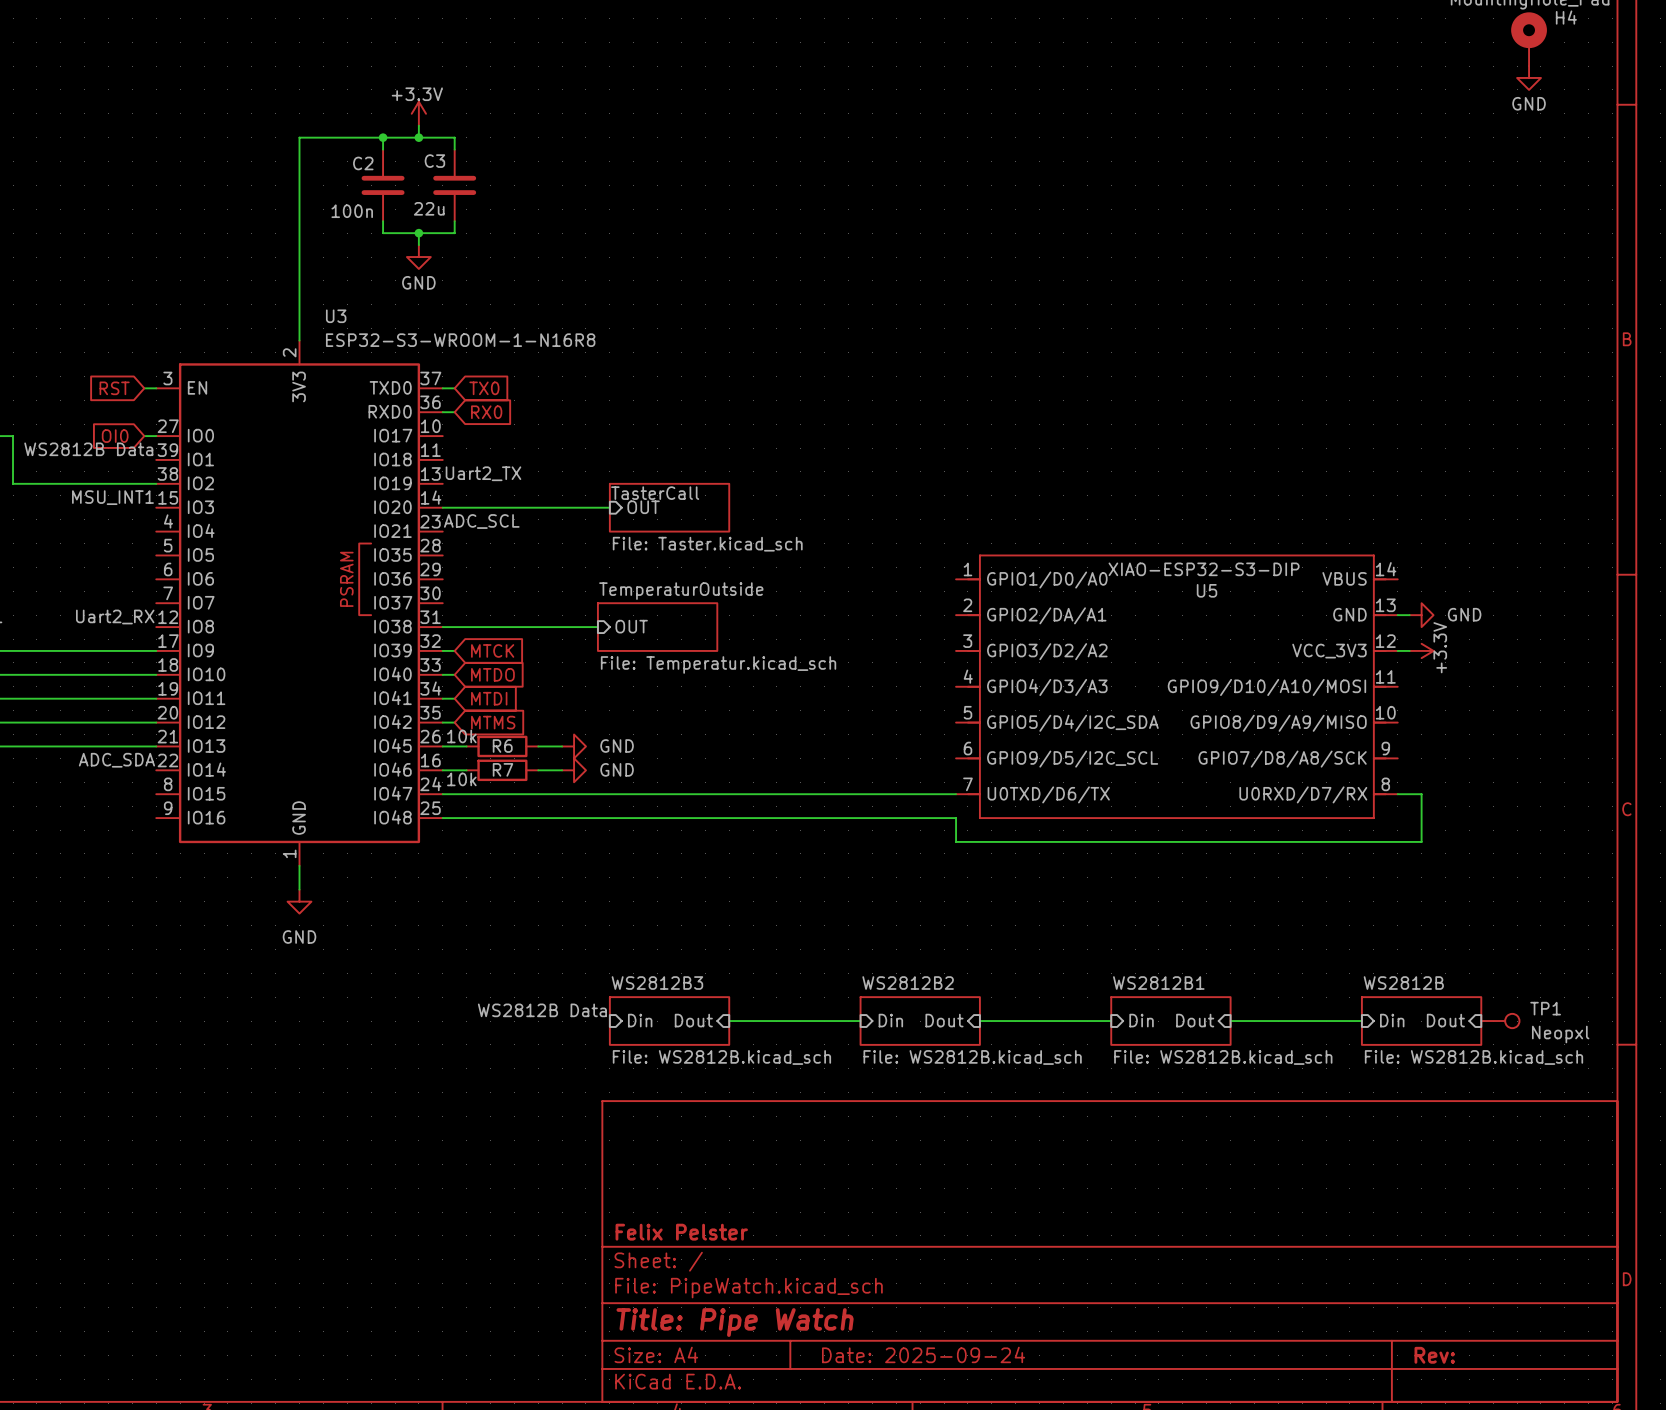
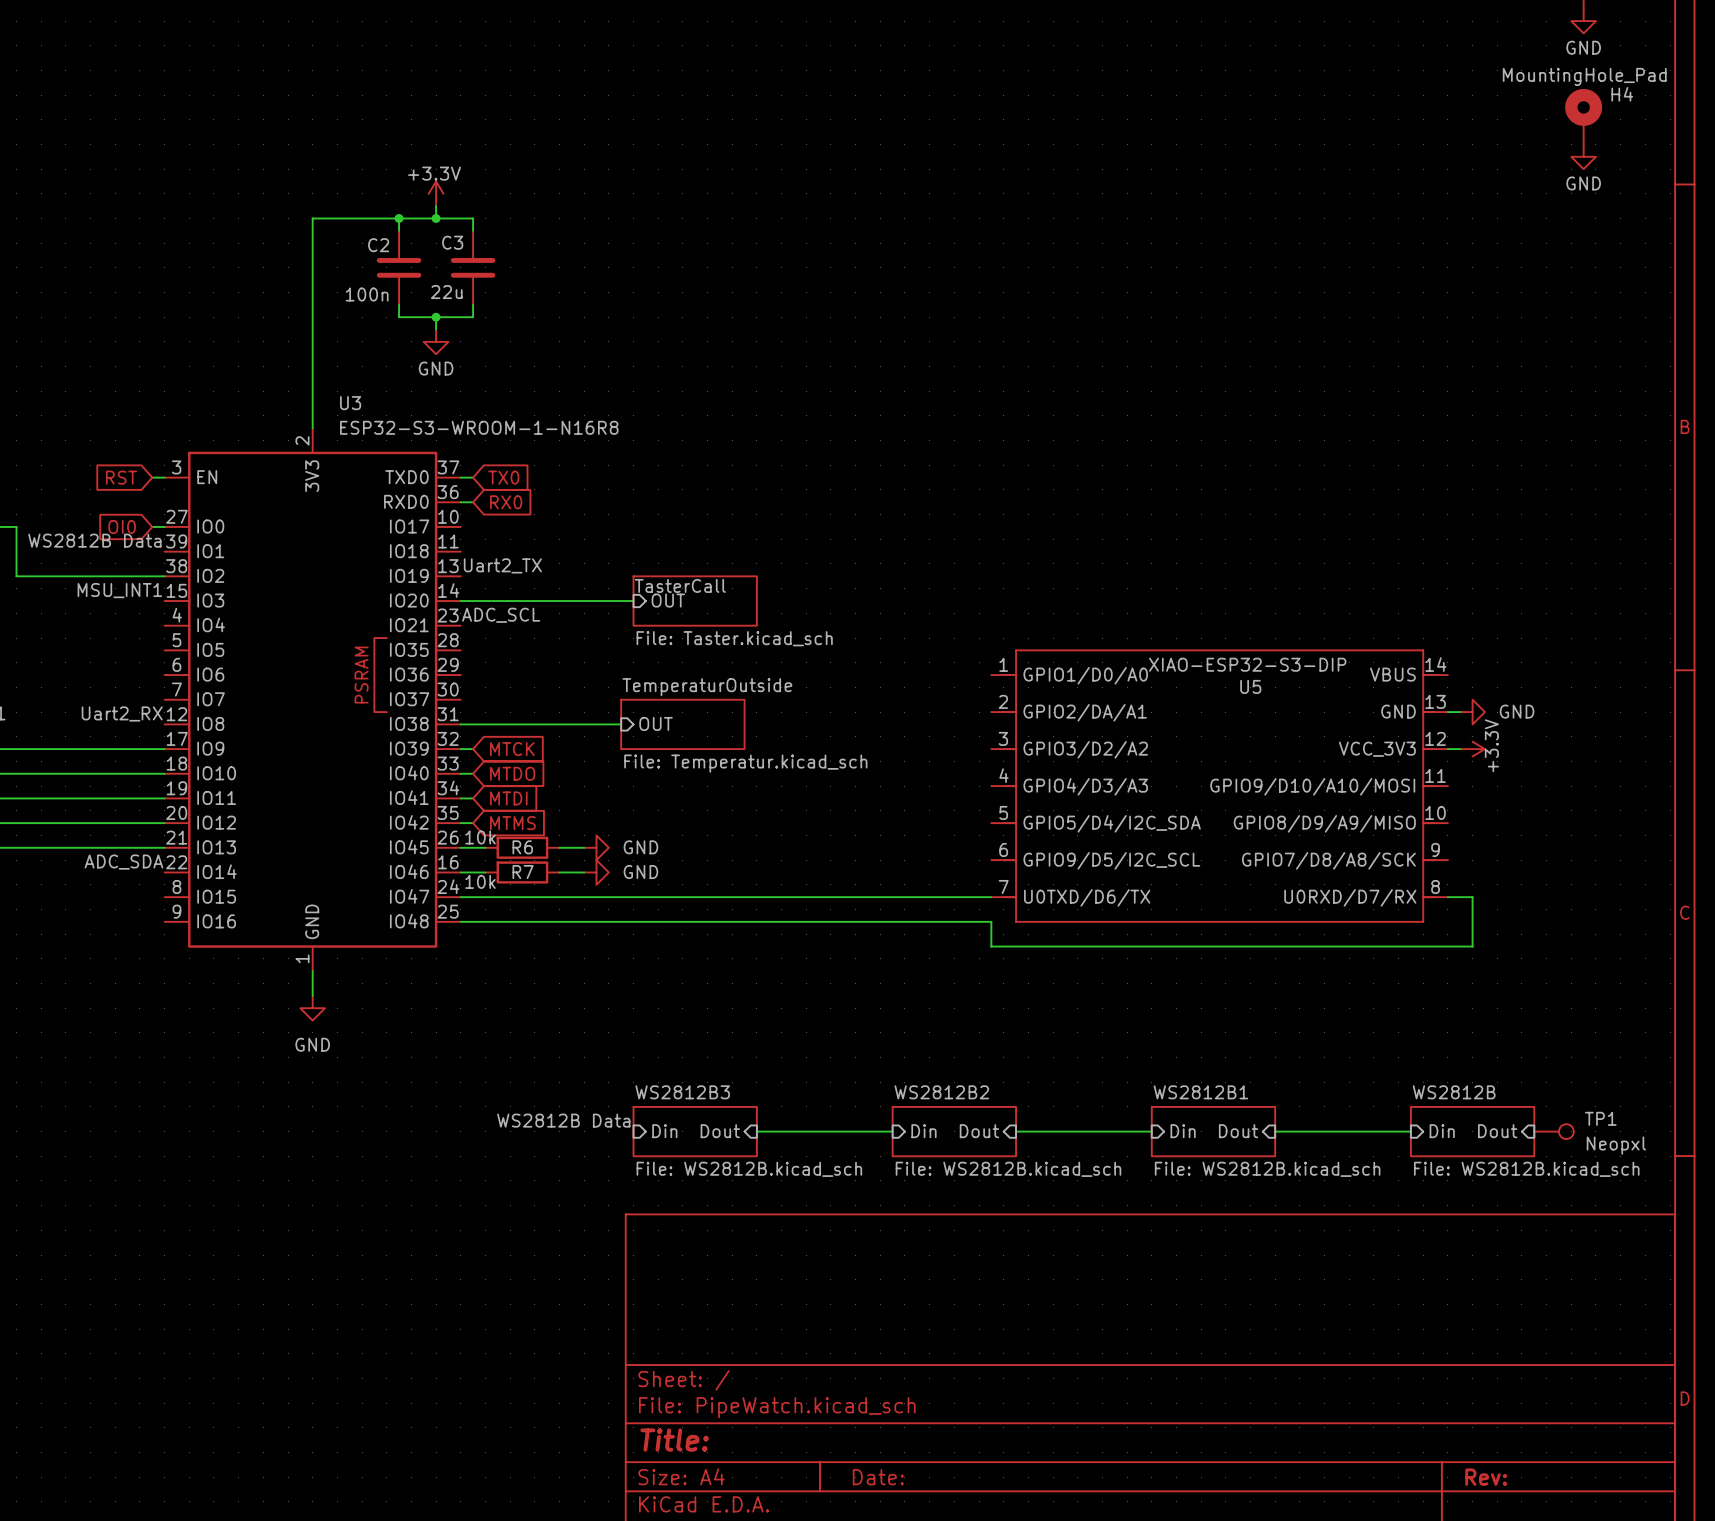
title block: Felix Pelster (681, 1232) -> none
title block: Title: Pipe Watch (735, 1322) -> Title: (674, 1440)
title block: Date: 2025-09-24 (923, 1354) -> Date: (878, 1477)

